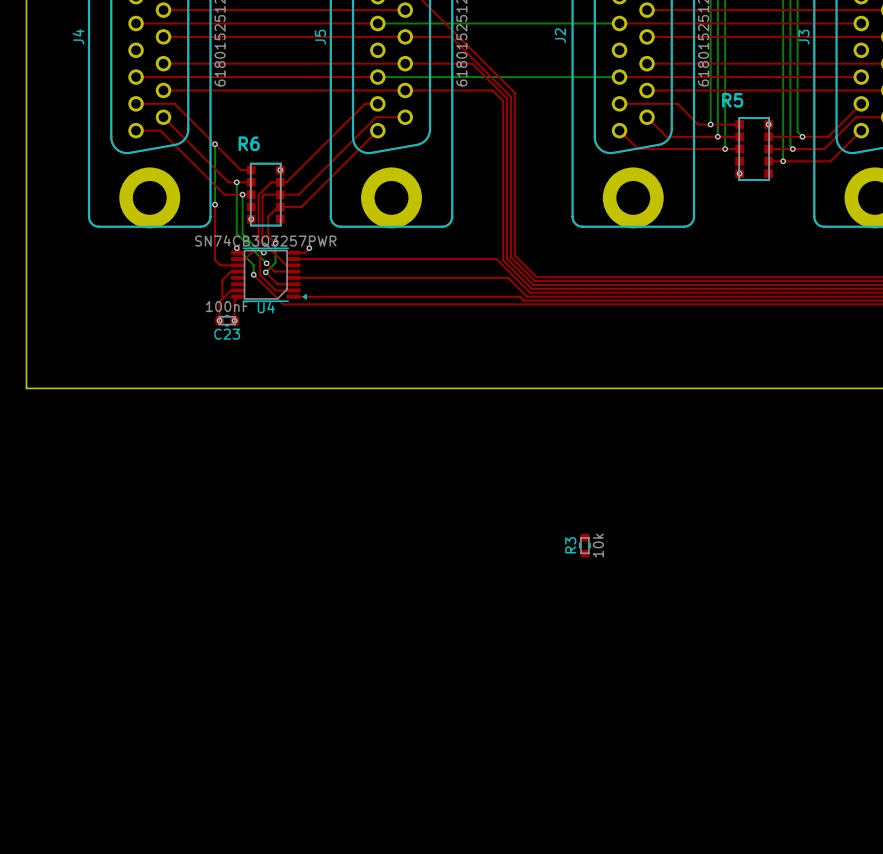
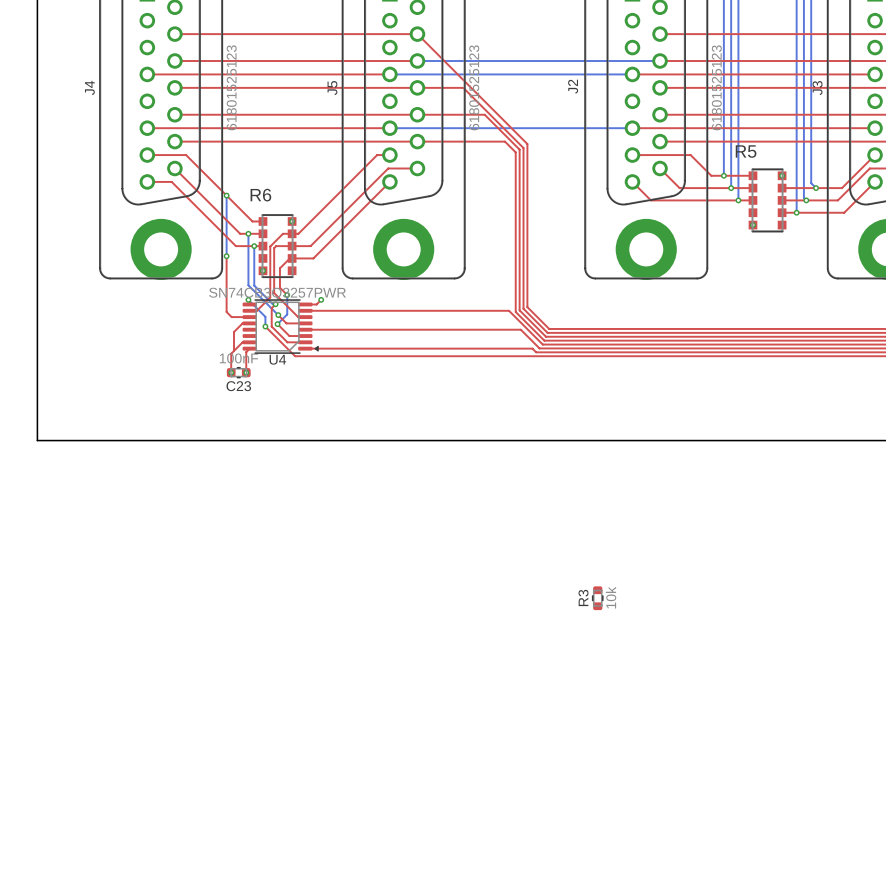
bottom track: none -> (417, 60) (660, 60)

